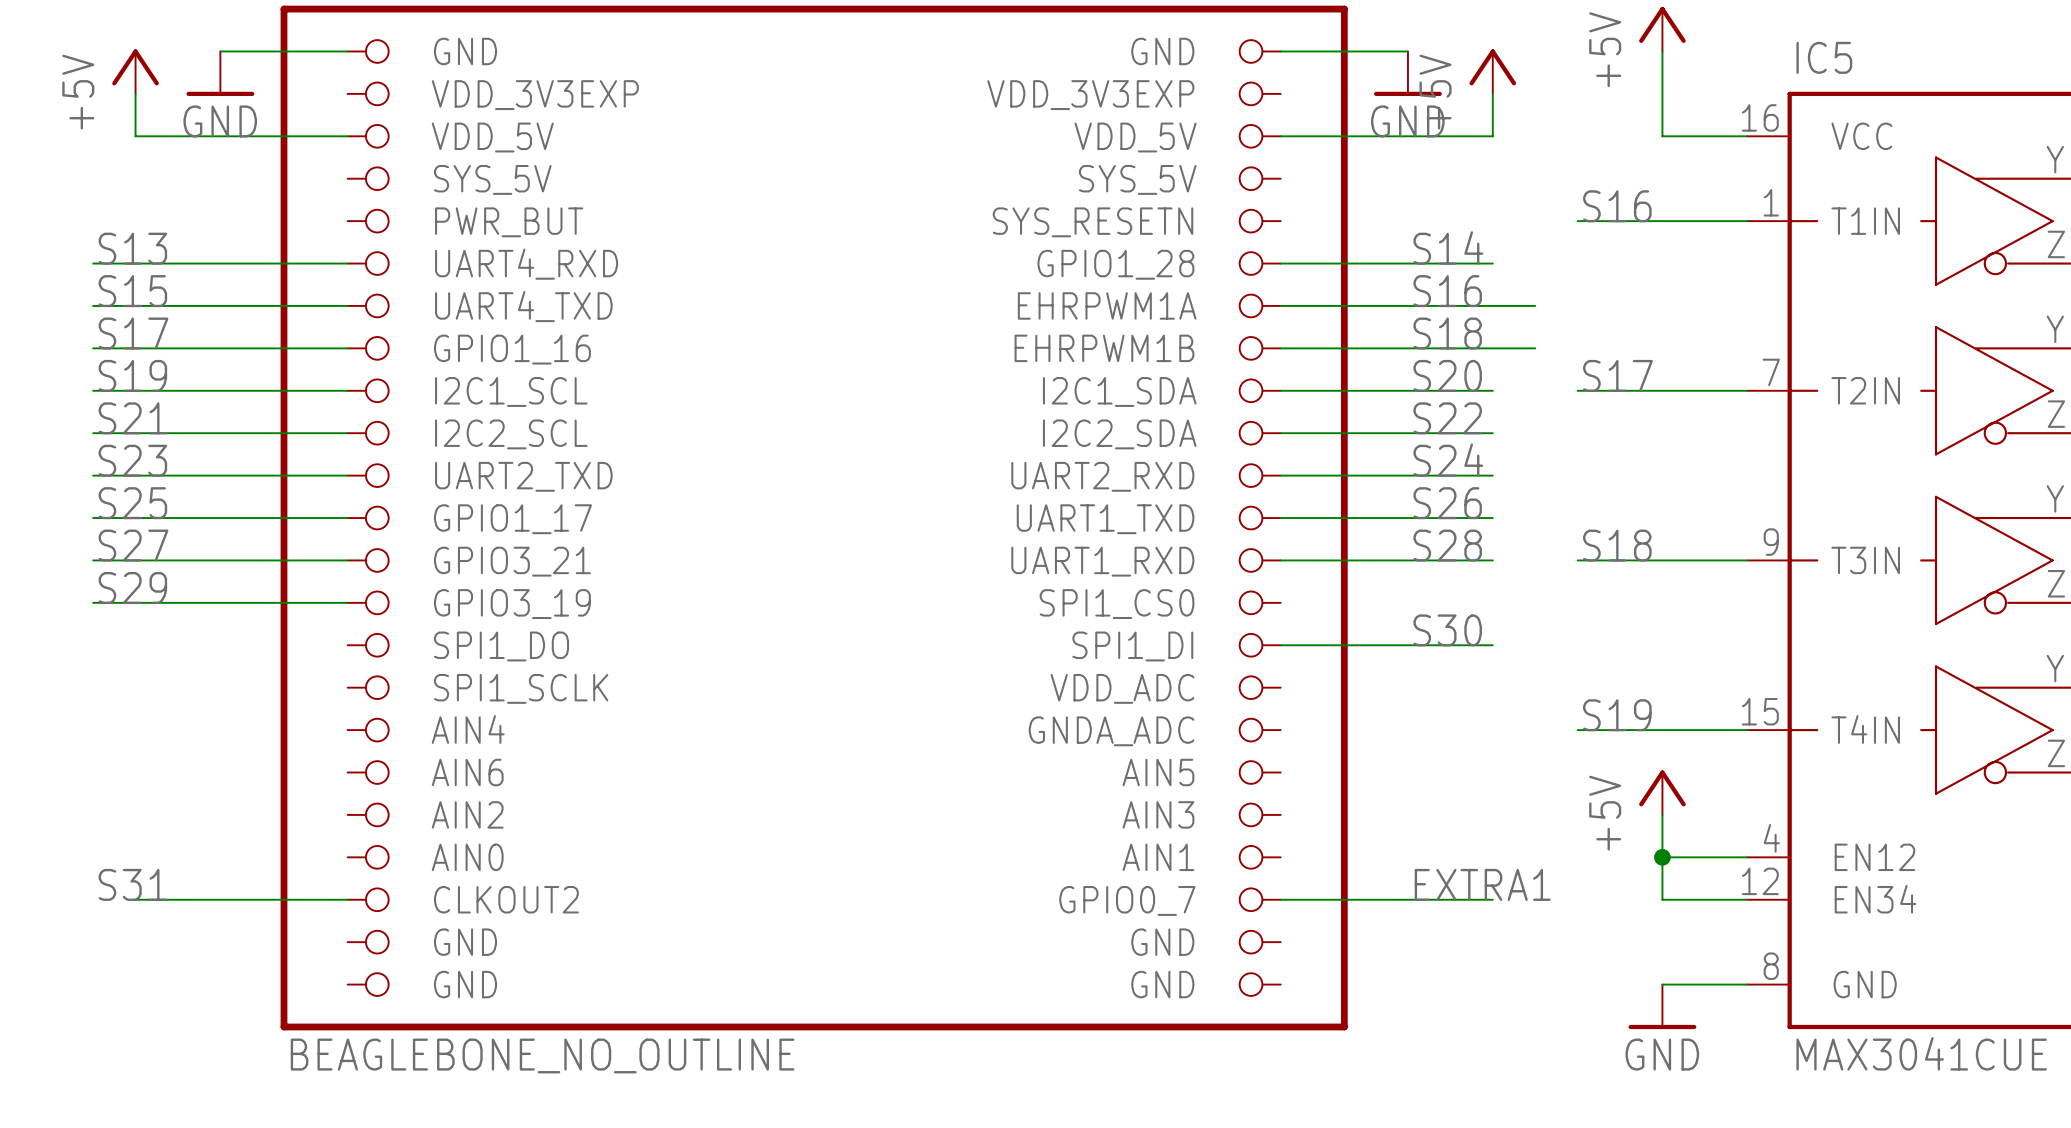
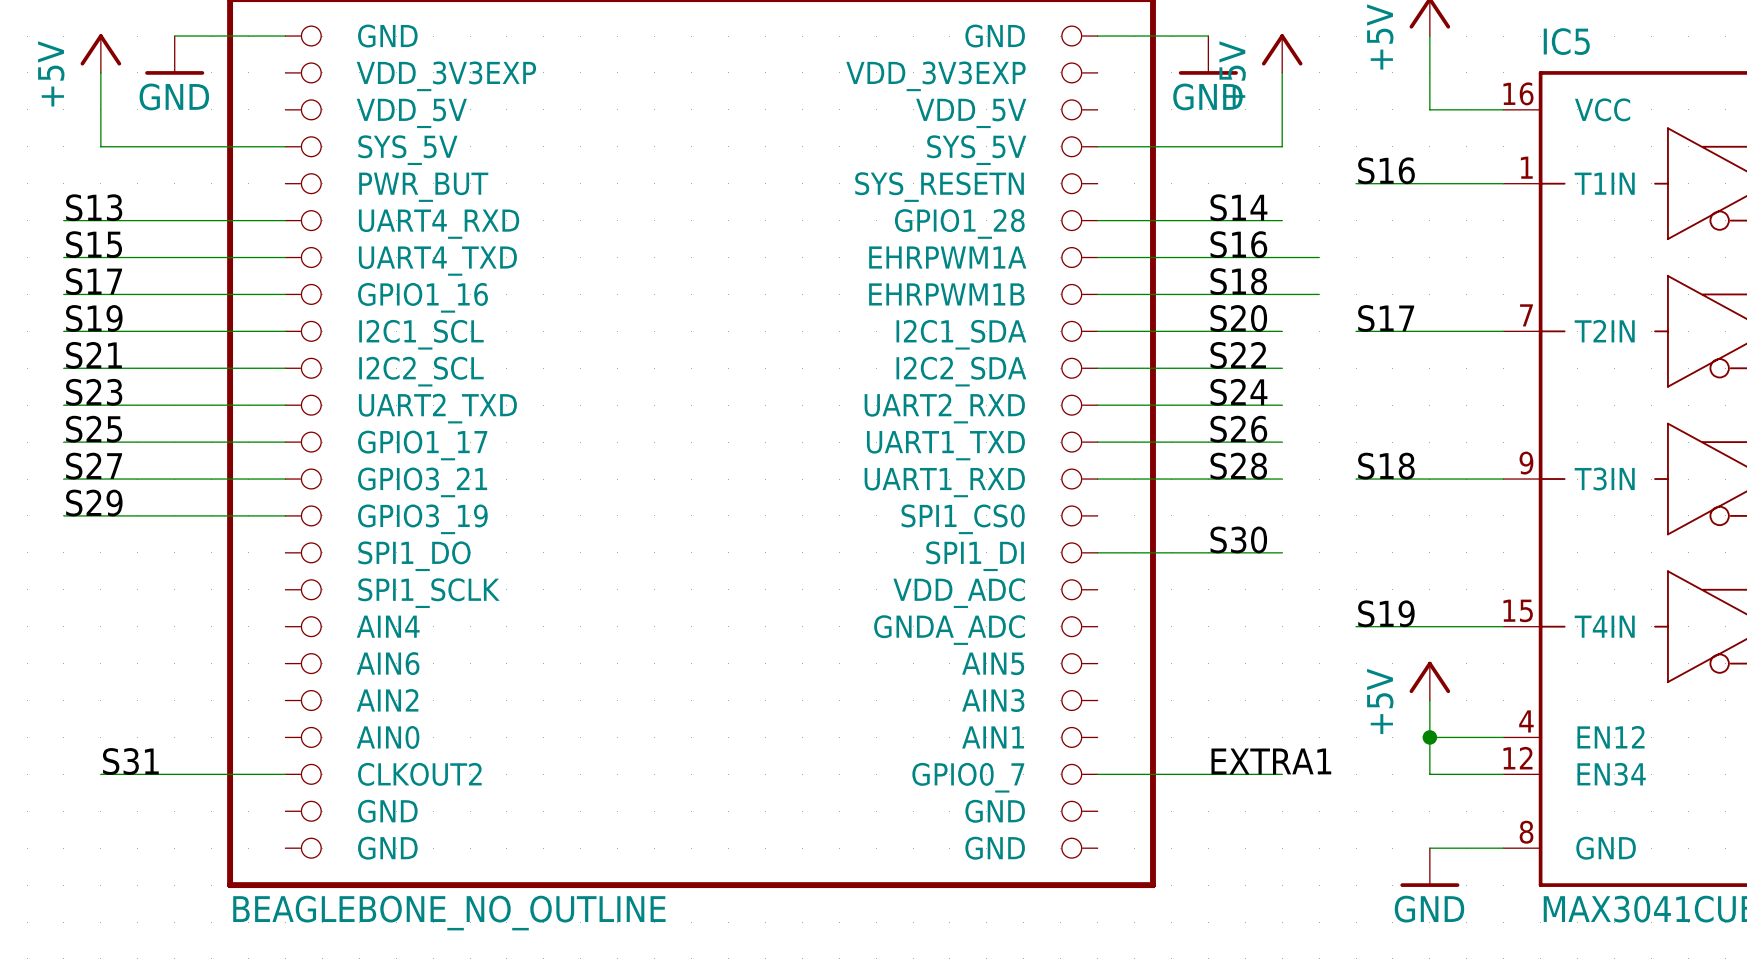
wire: (135, 136) (347, 136) -> (100, 109) (100, 146) (285, 146)
wire: (1280, 136) (1492, 136) -> (1097, 146) (1282, 146) (1282, 109)
label position: S31 (132, 884) -> S31 (130, 761)

